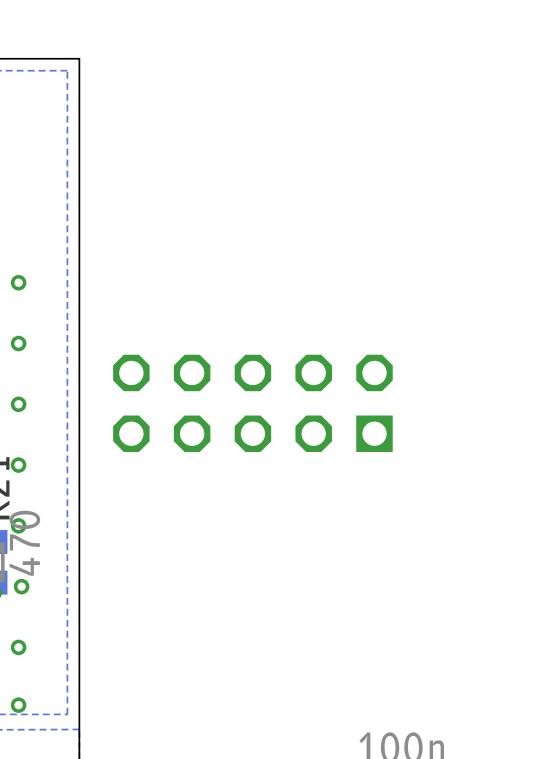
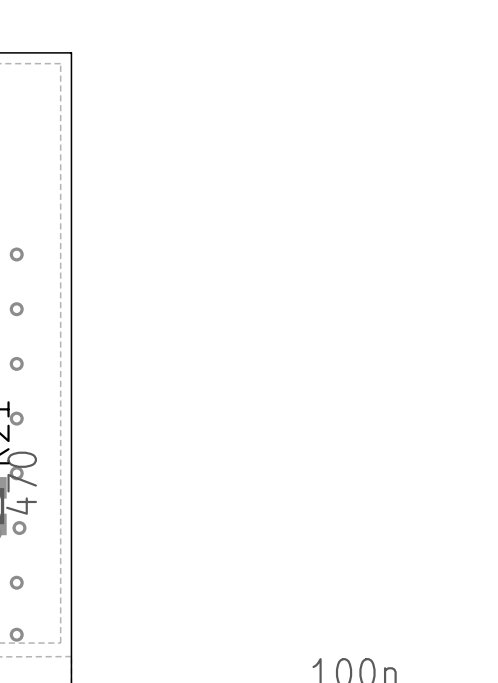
part: (252, 403) -> none

